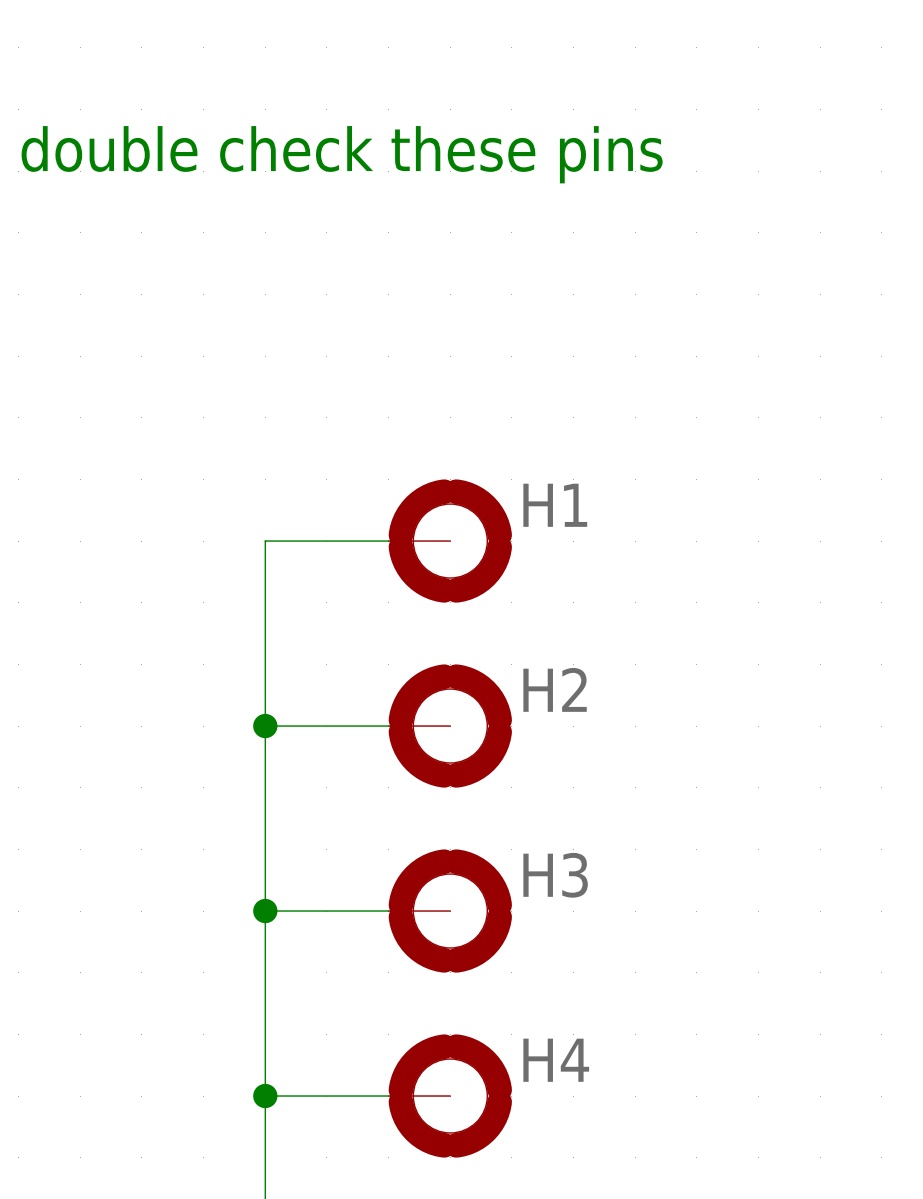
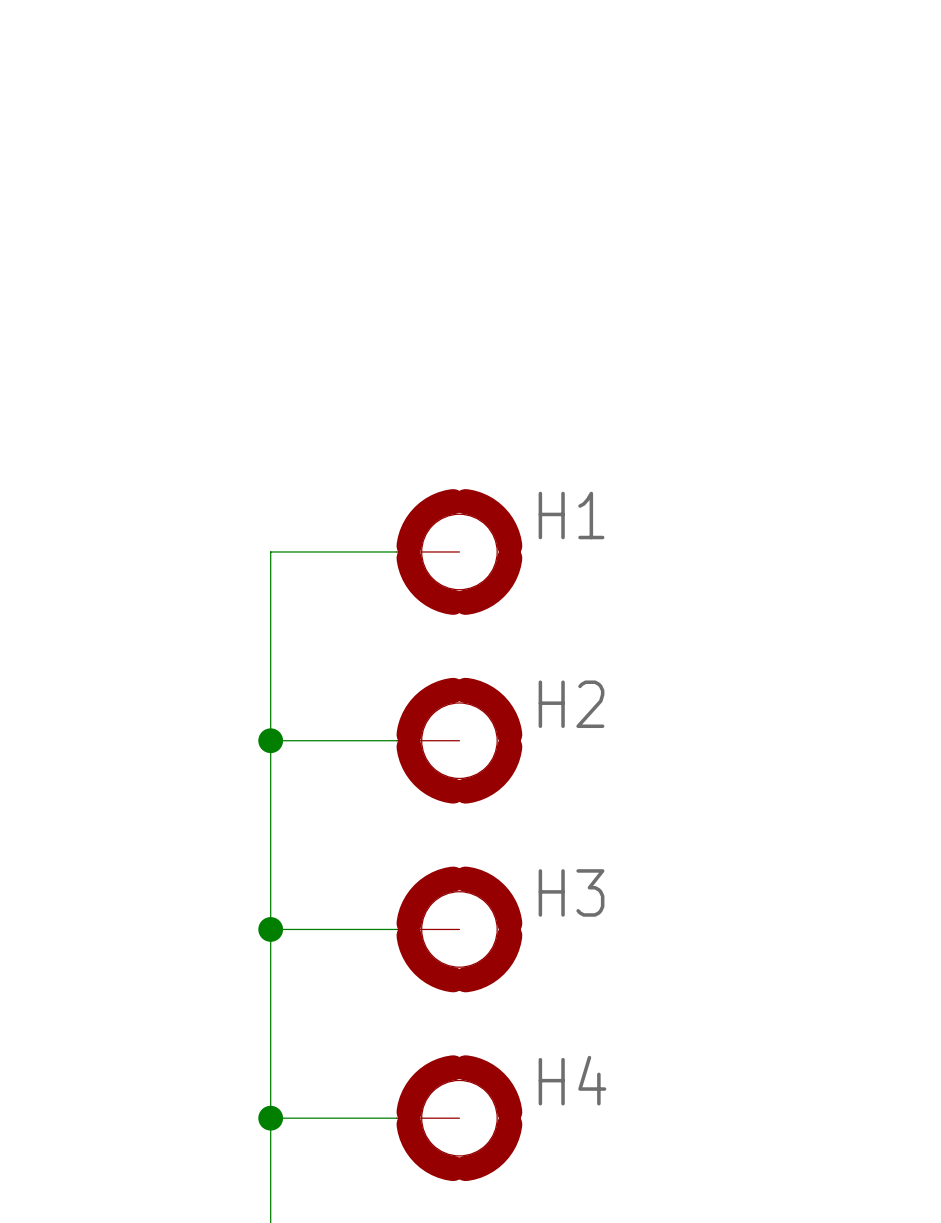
text: double check these pins (342, 154) -> none

